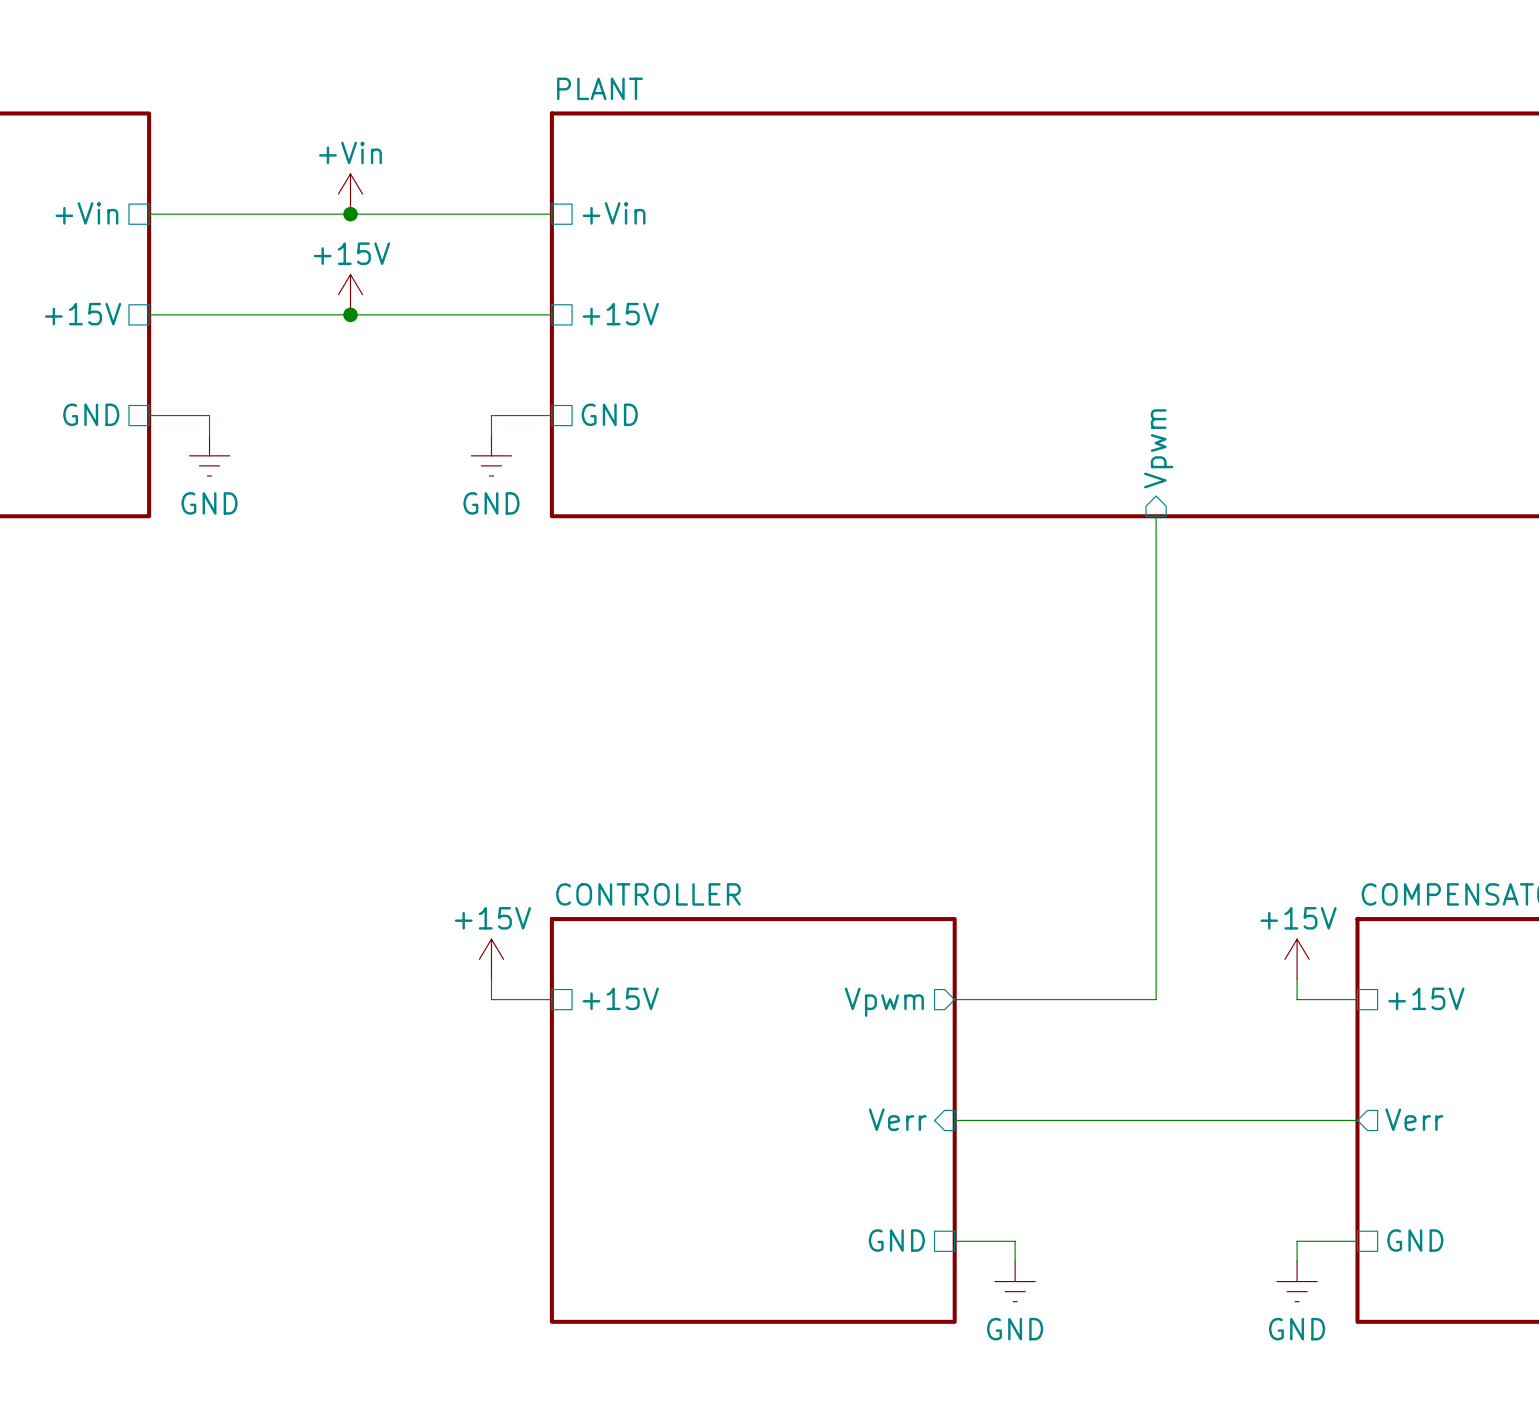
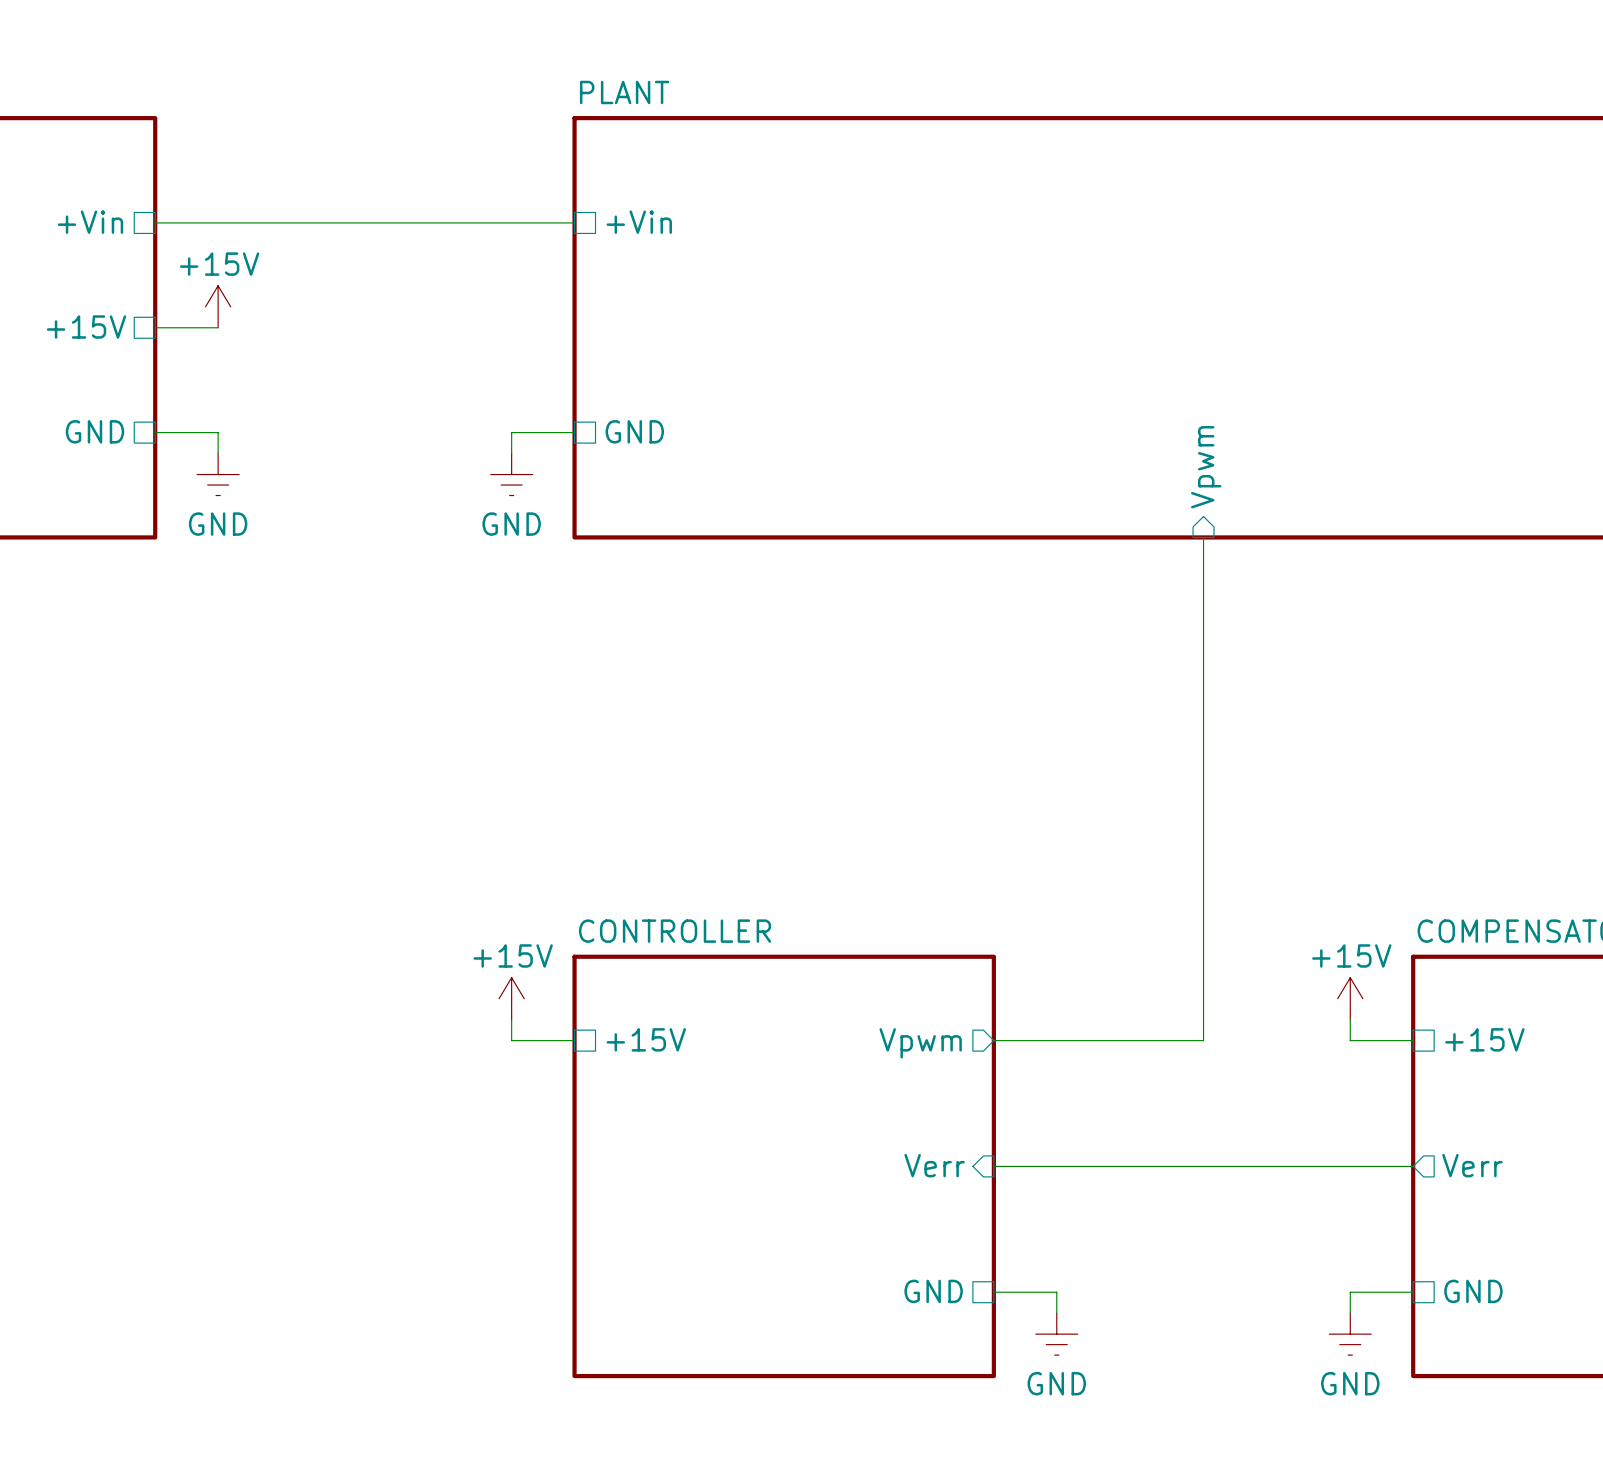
power symbol: +Vin (350, 194) -> none
junction: (350, 214) -> none
power symbol position: +15V (350, 294) -> +15V (218, 306)
wire: (209, 314) (551, 314) -> none
junction: (350, 314) -> none
sheet pin: +15V (620, 314) -> none

